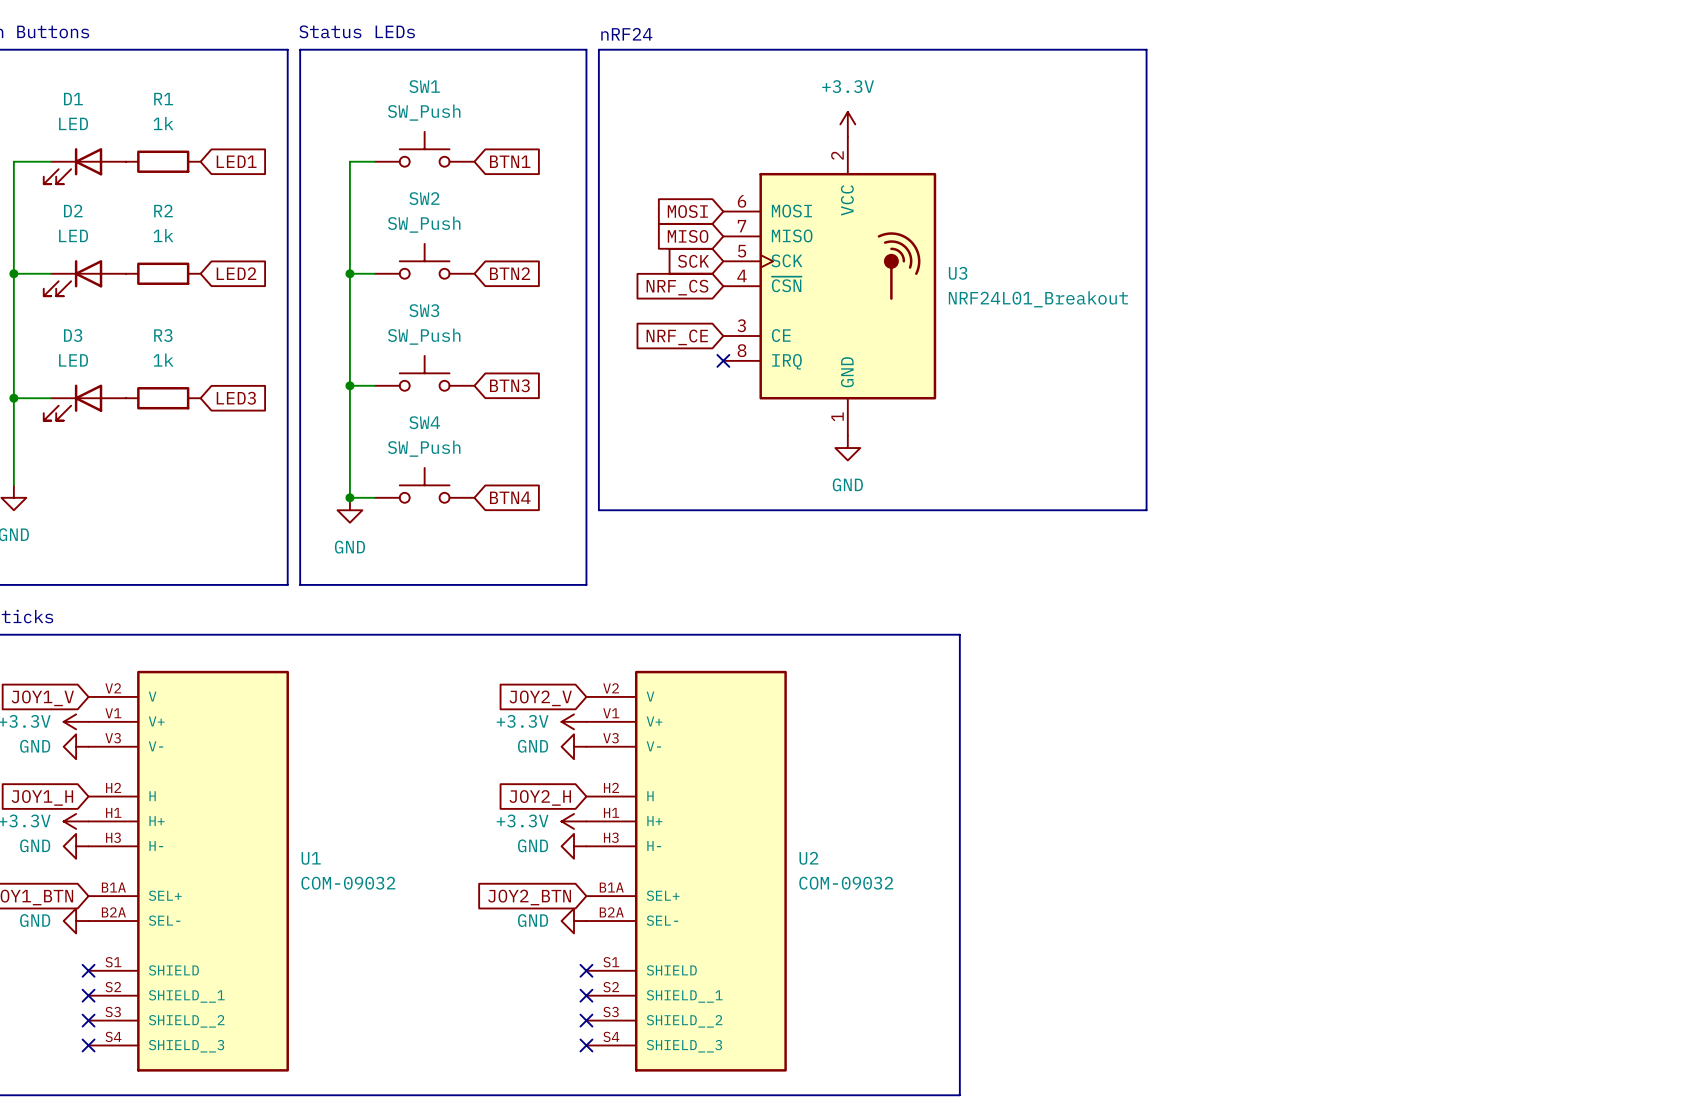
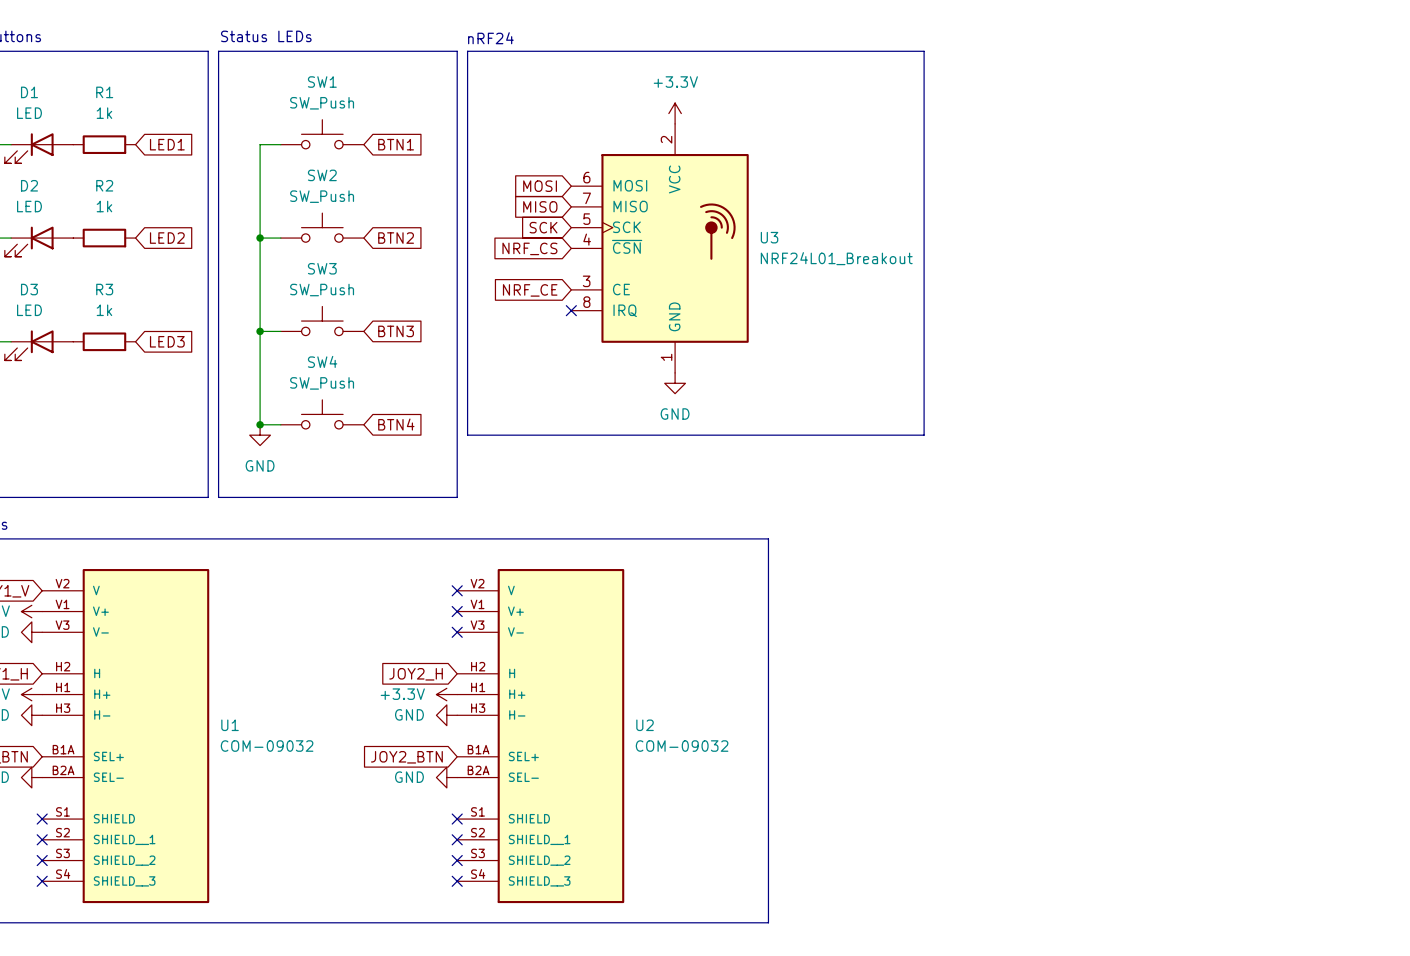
no-connect mark: none -> (457, 590)
global label: JOY2_V (540, 698) -> none
power symbol: +3.3V (573, 721) -> none
no-connect mark: none -> (457, 611)
power symbol: GND (573, 746) -> none
no-connect mark: none -> (457, 632)

